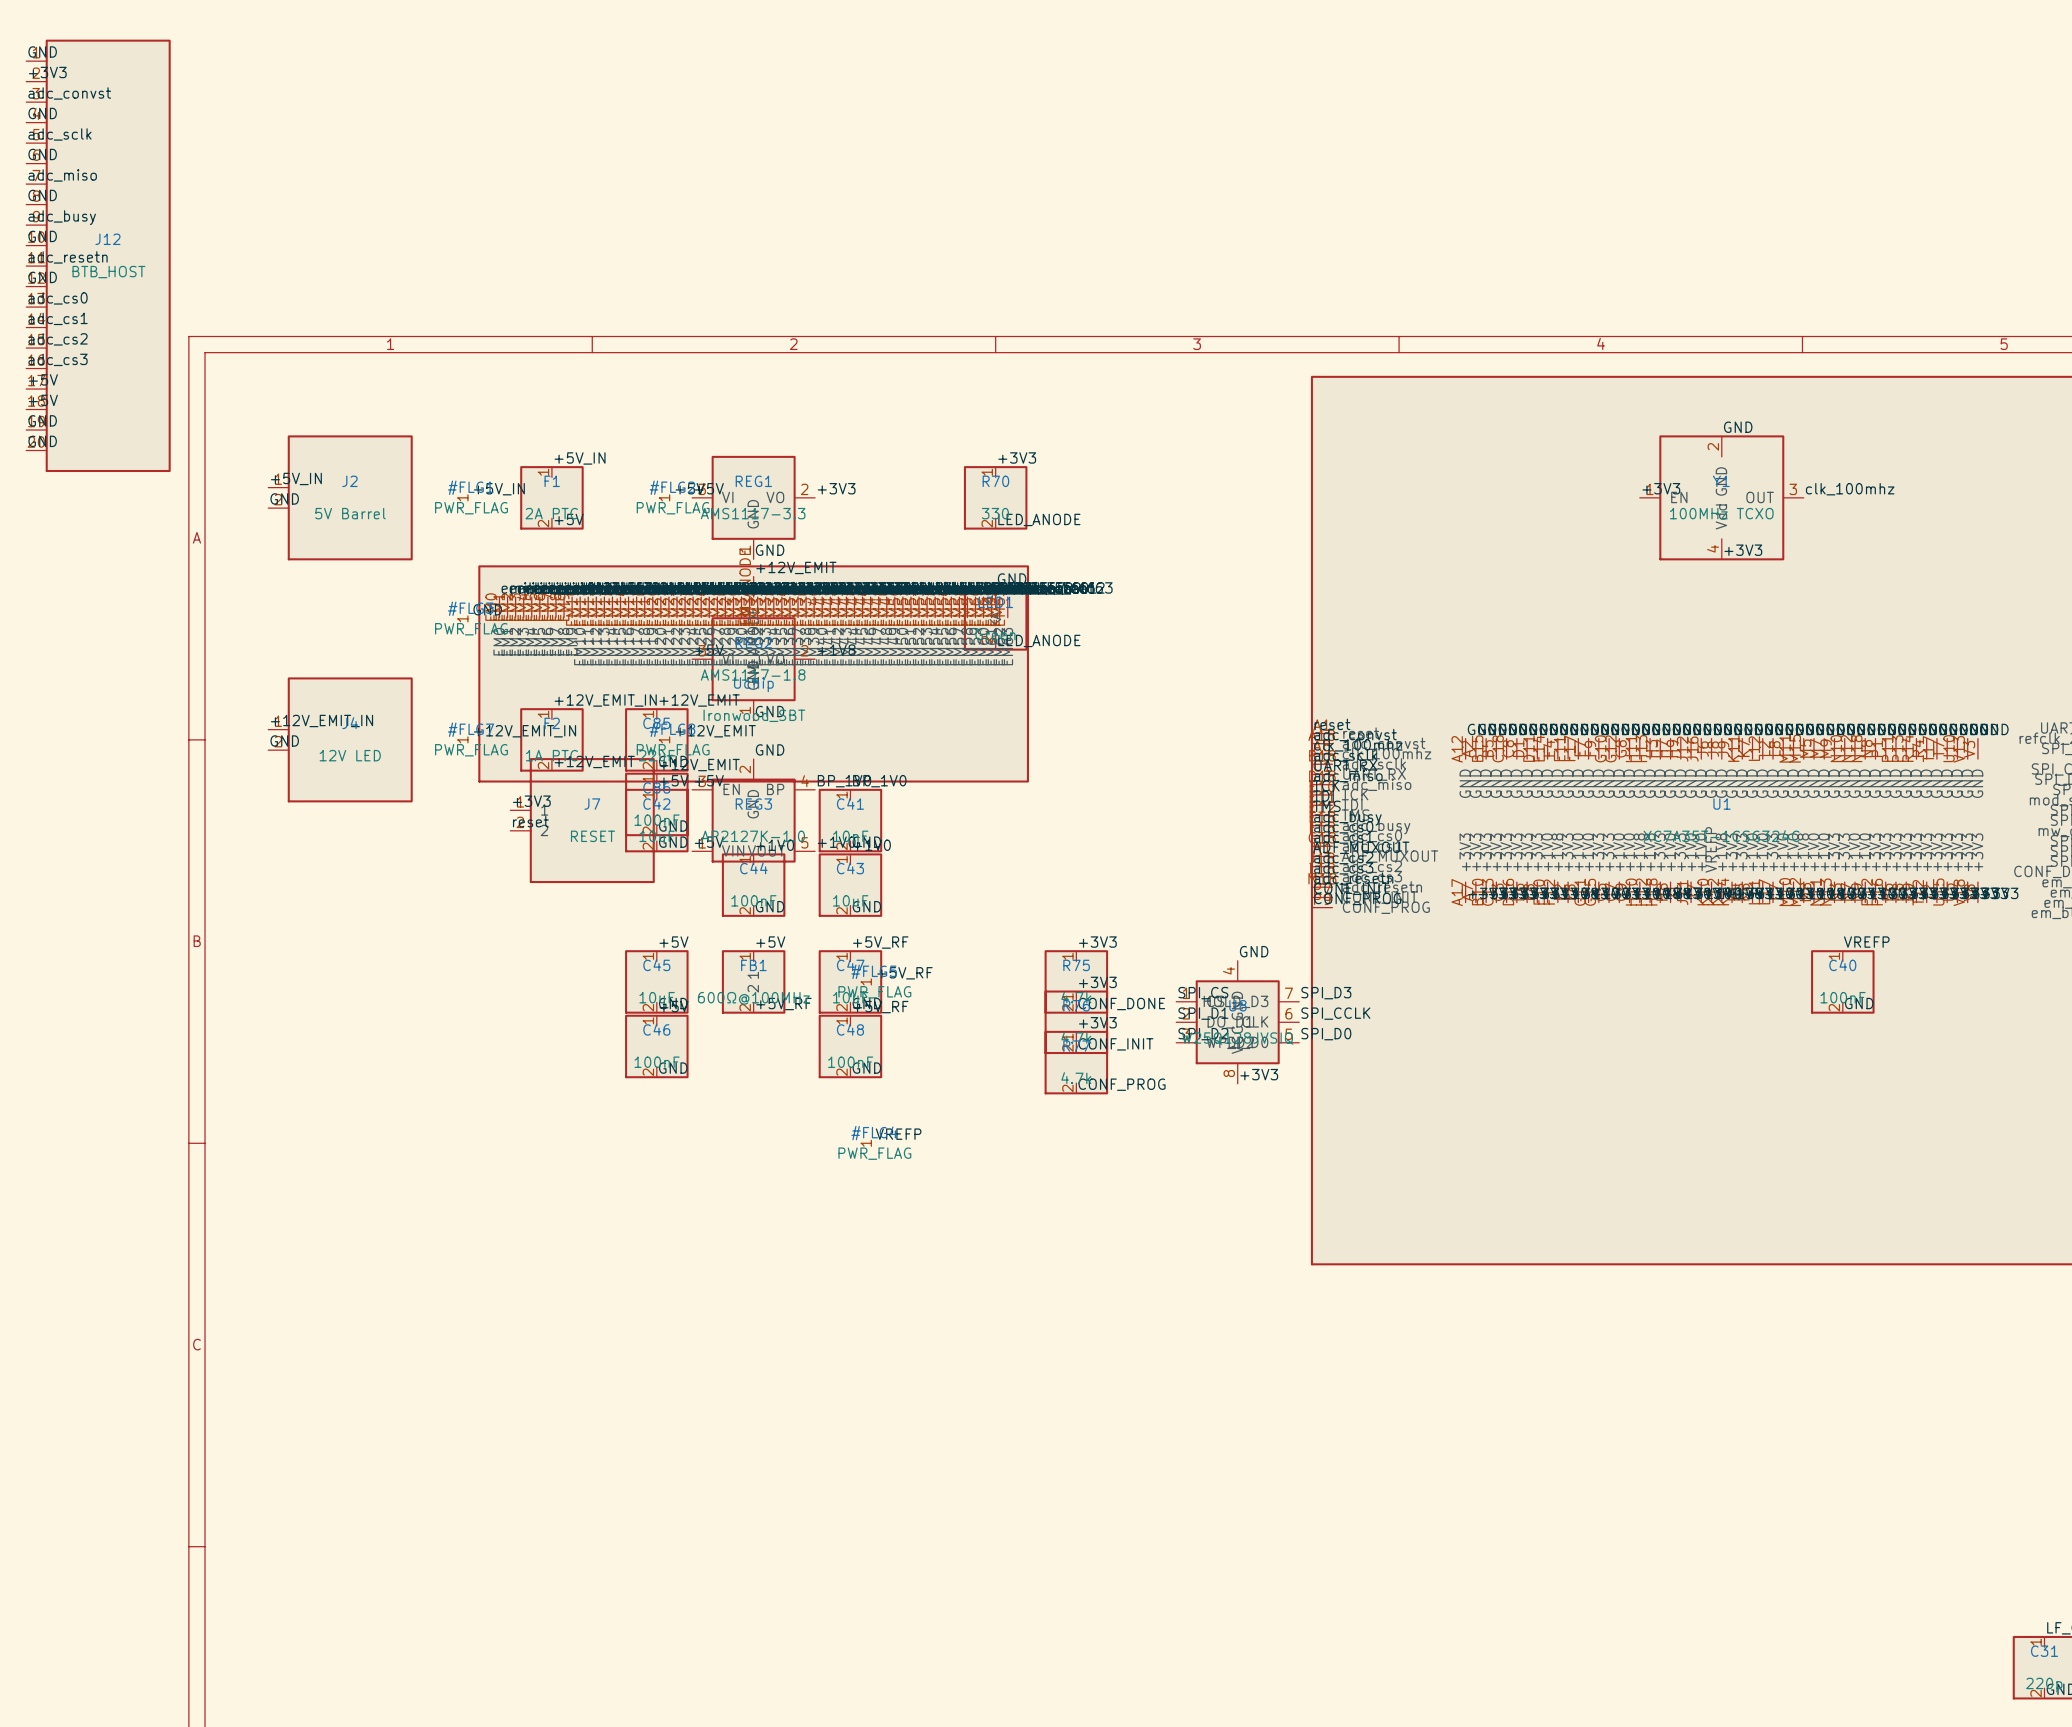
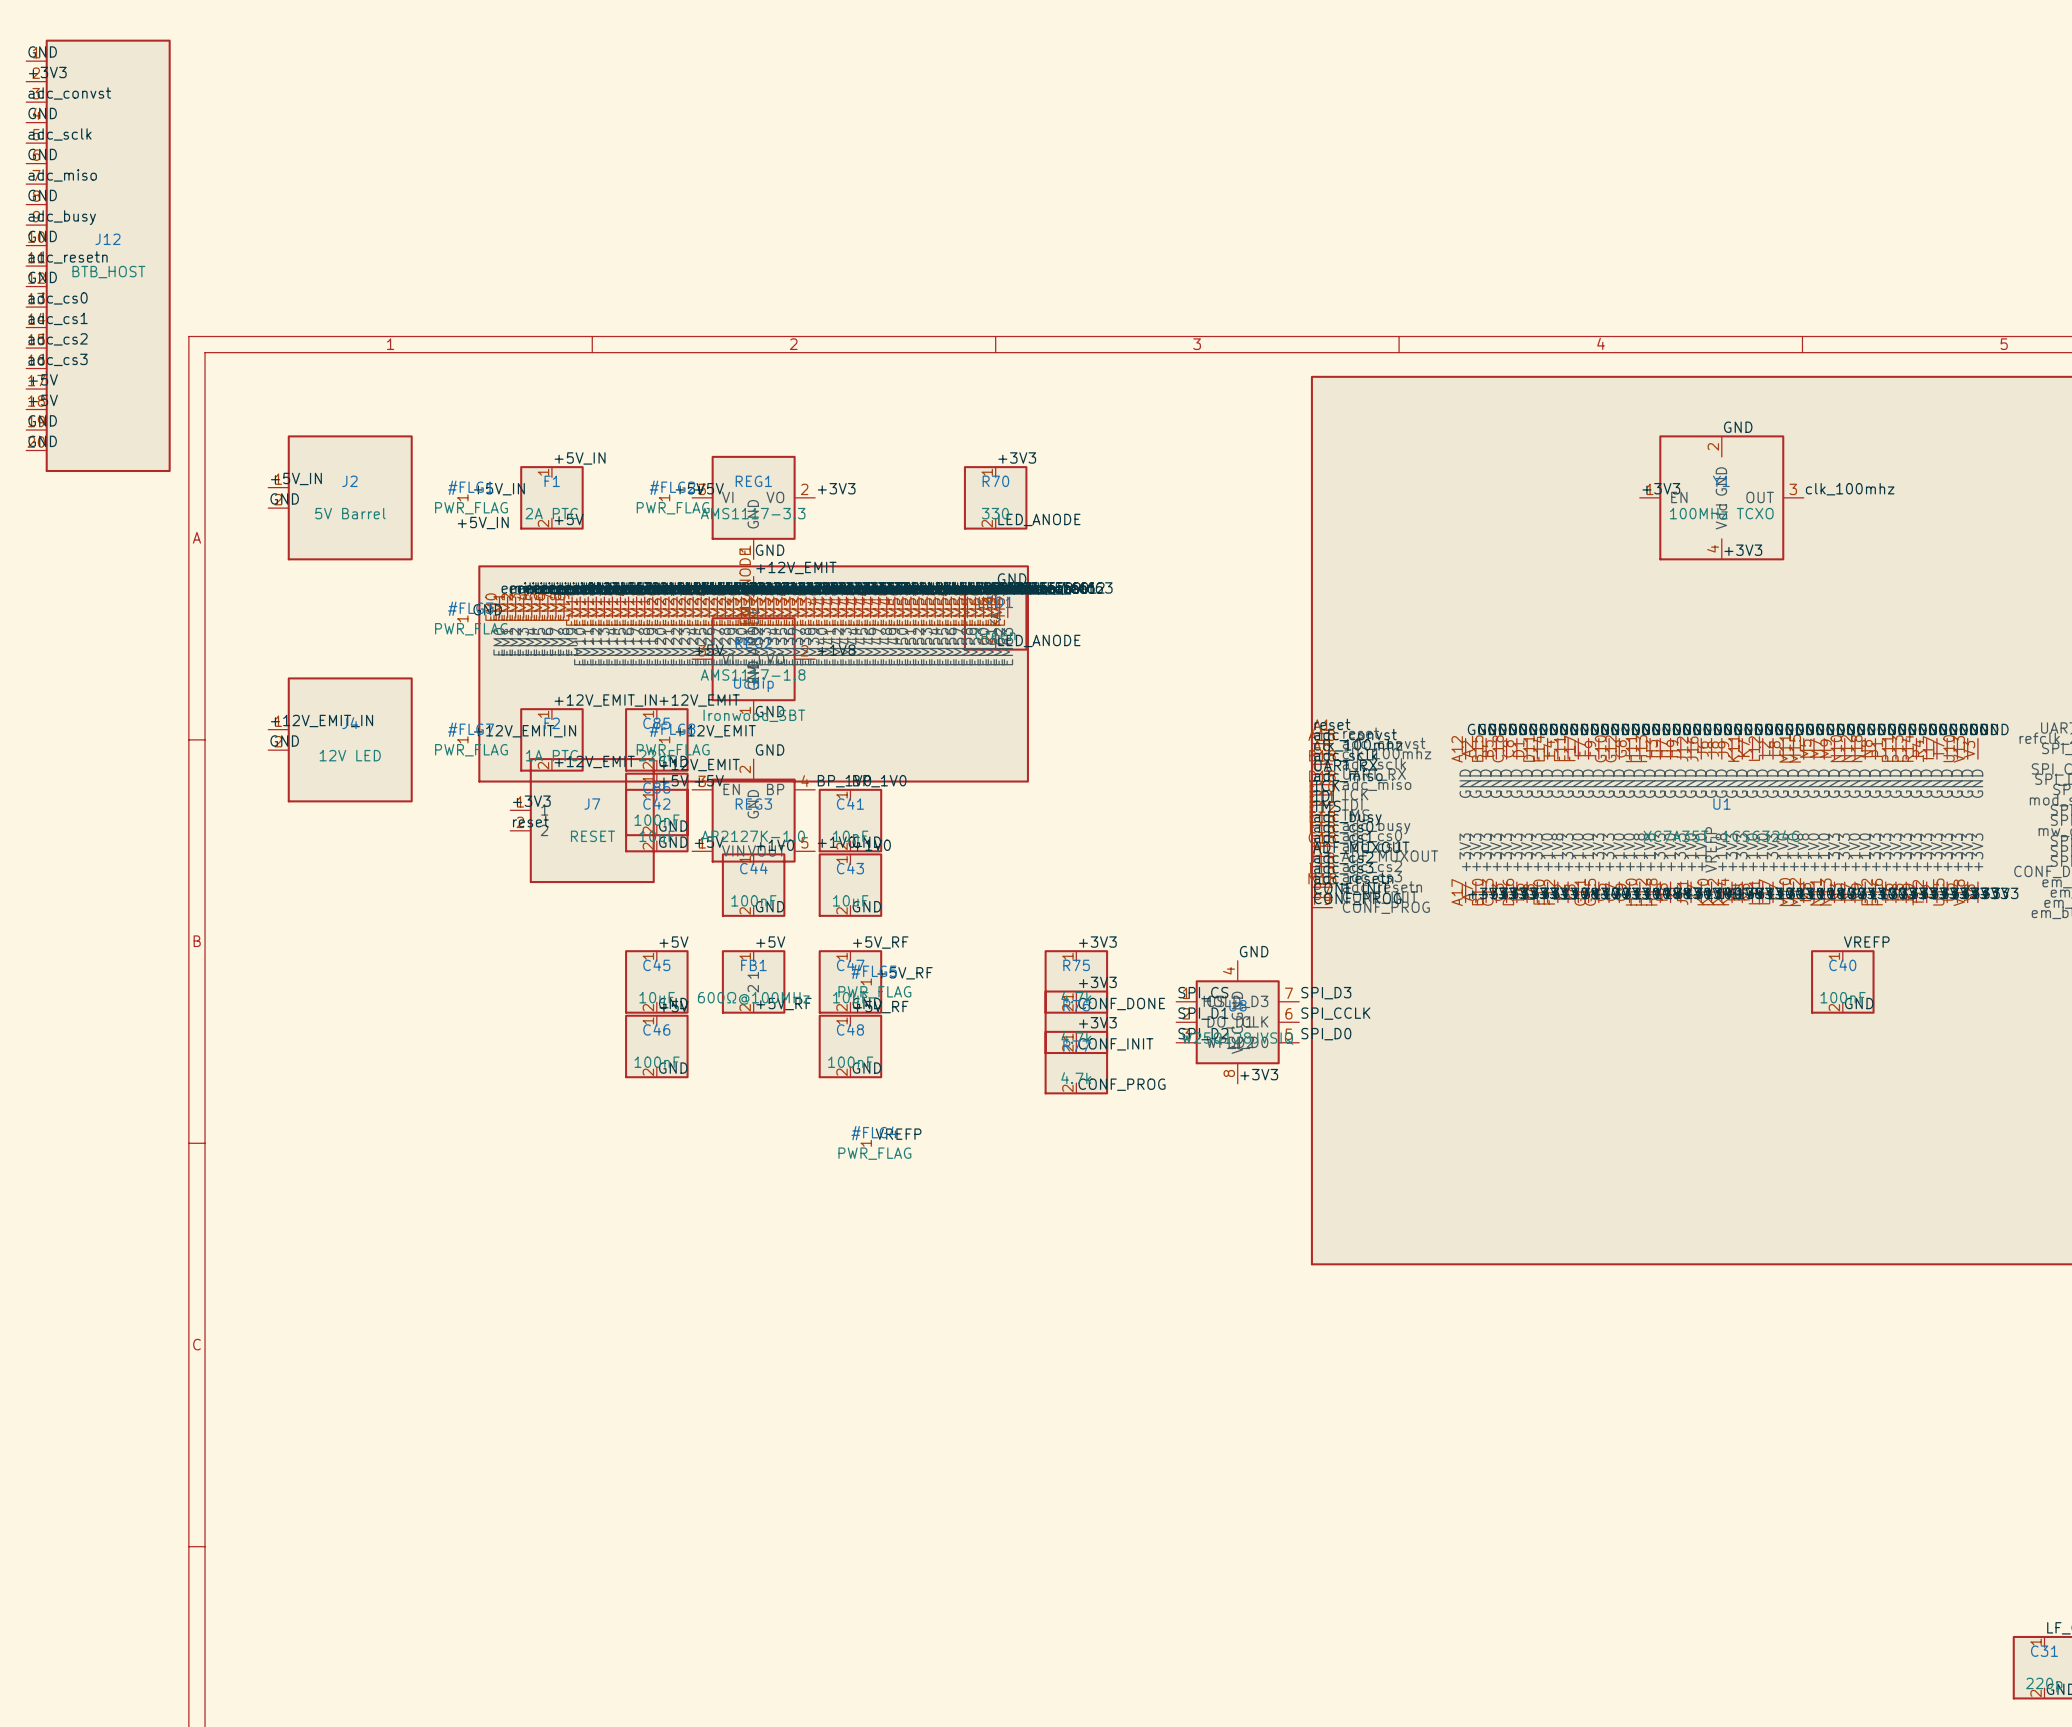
label: none -> +5V_IN (483, 523)

